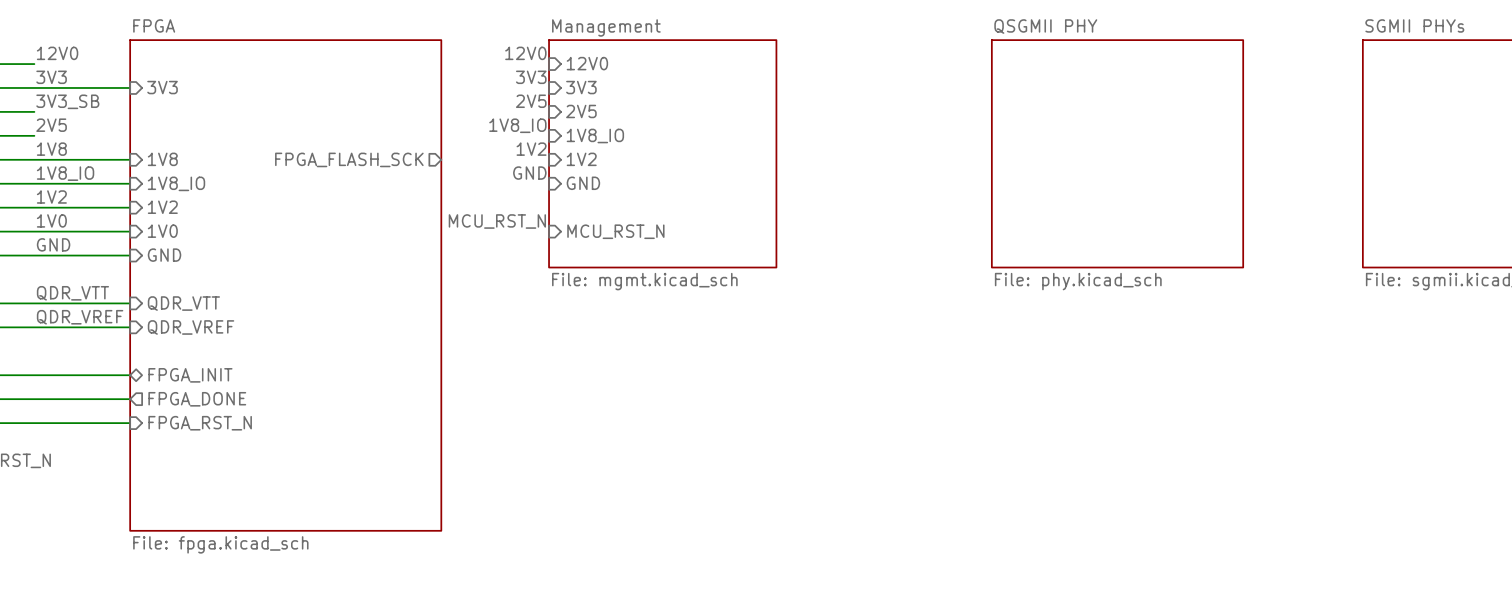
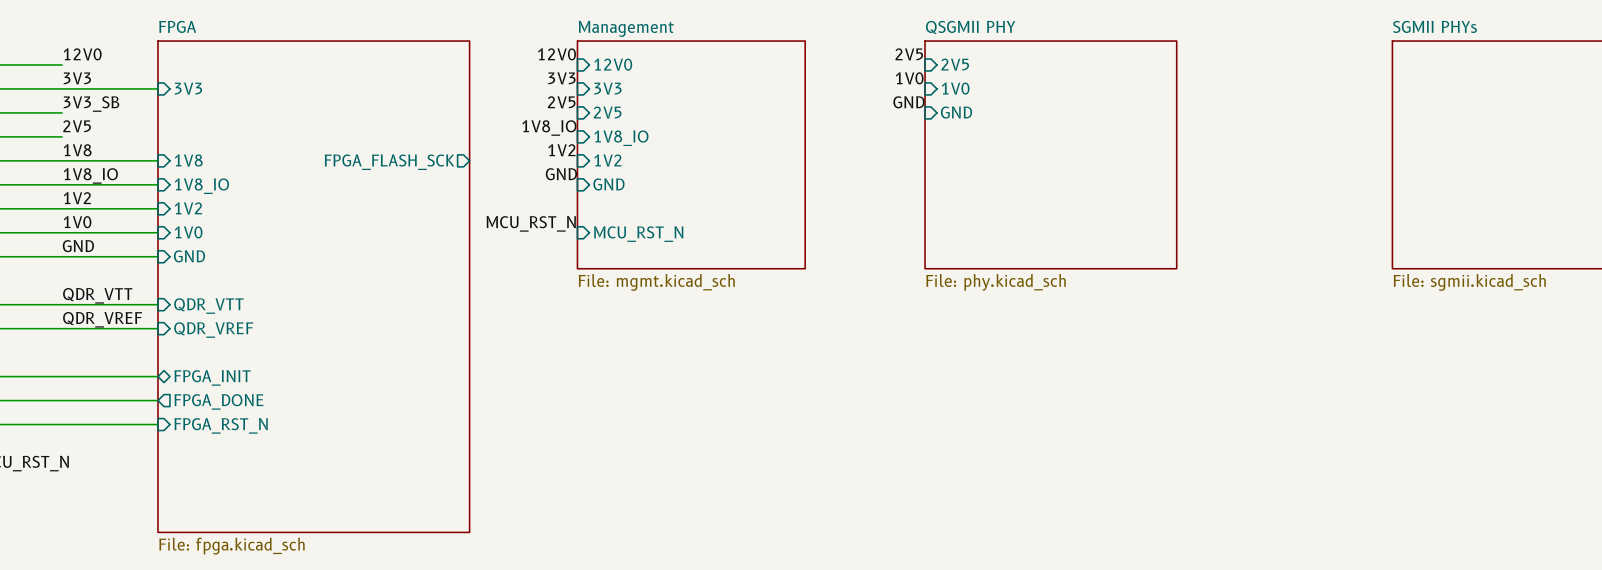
label: none -> 2V5 (909, 54)
sheet pin: none -> 2V5 (955, 64)
label: none -> 1V0 (909, 78)
sheet pin: none -> 1V0 (955, 88)
label: none -> GND (908, 102)
sheet pin: none -> GND (956, 112)
sheet QSGMII PHY position: (1117, 153) -> (1050, 154)

